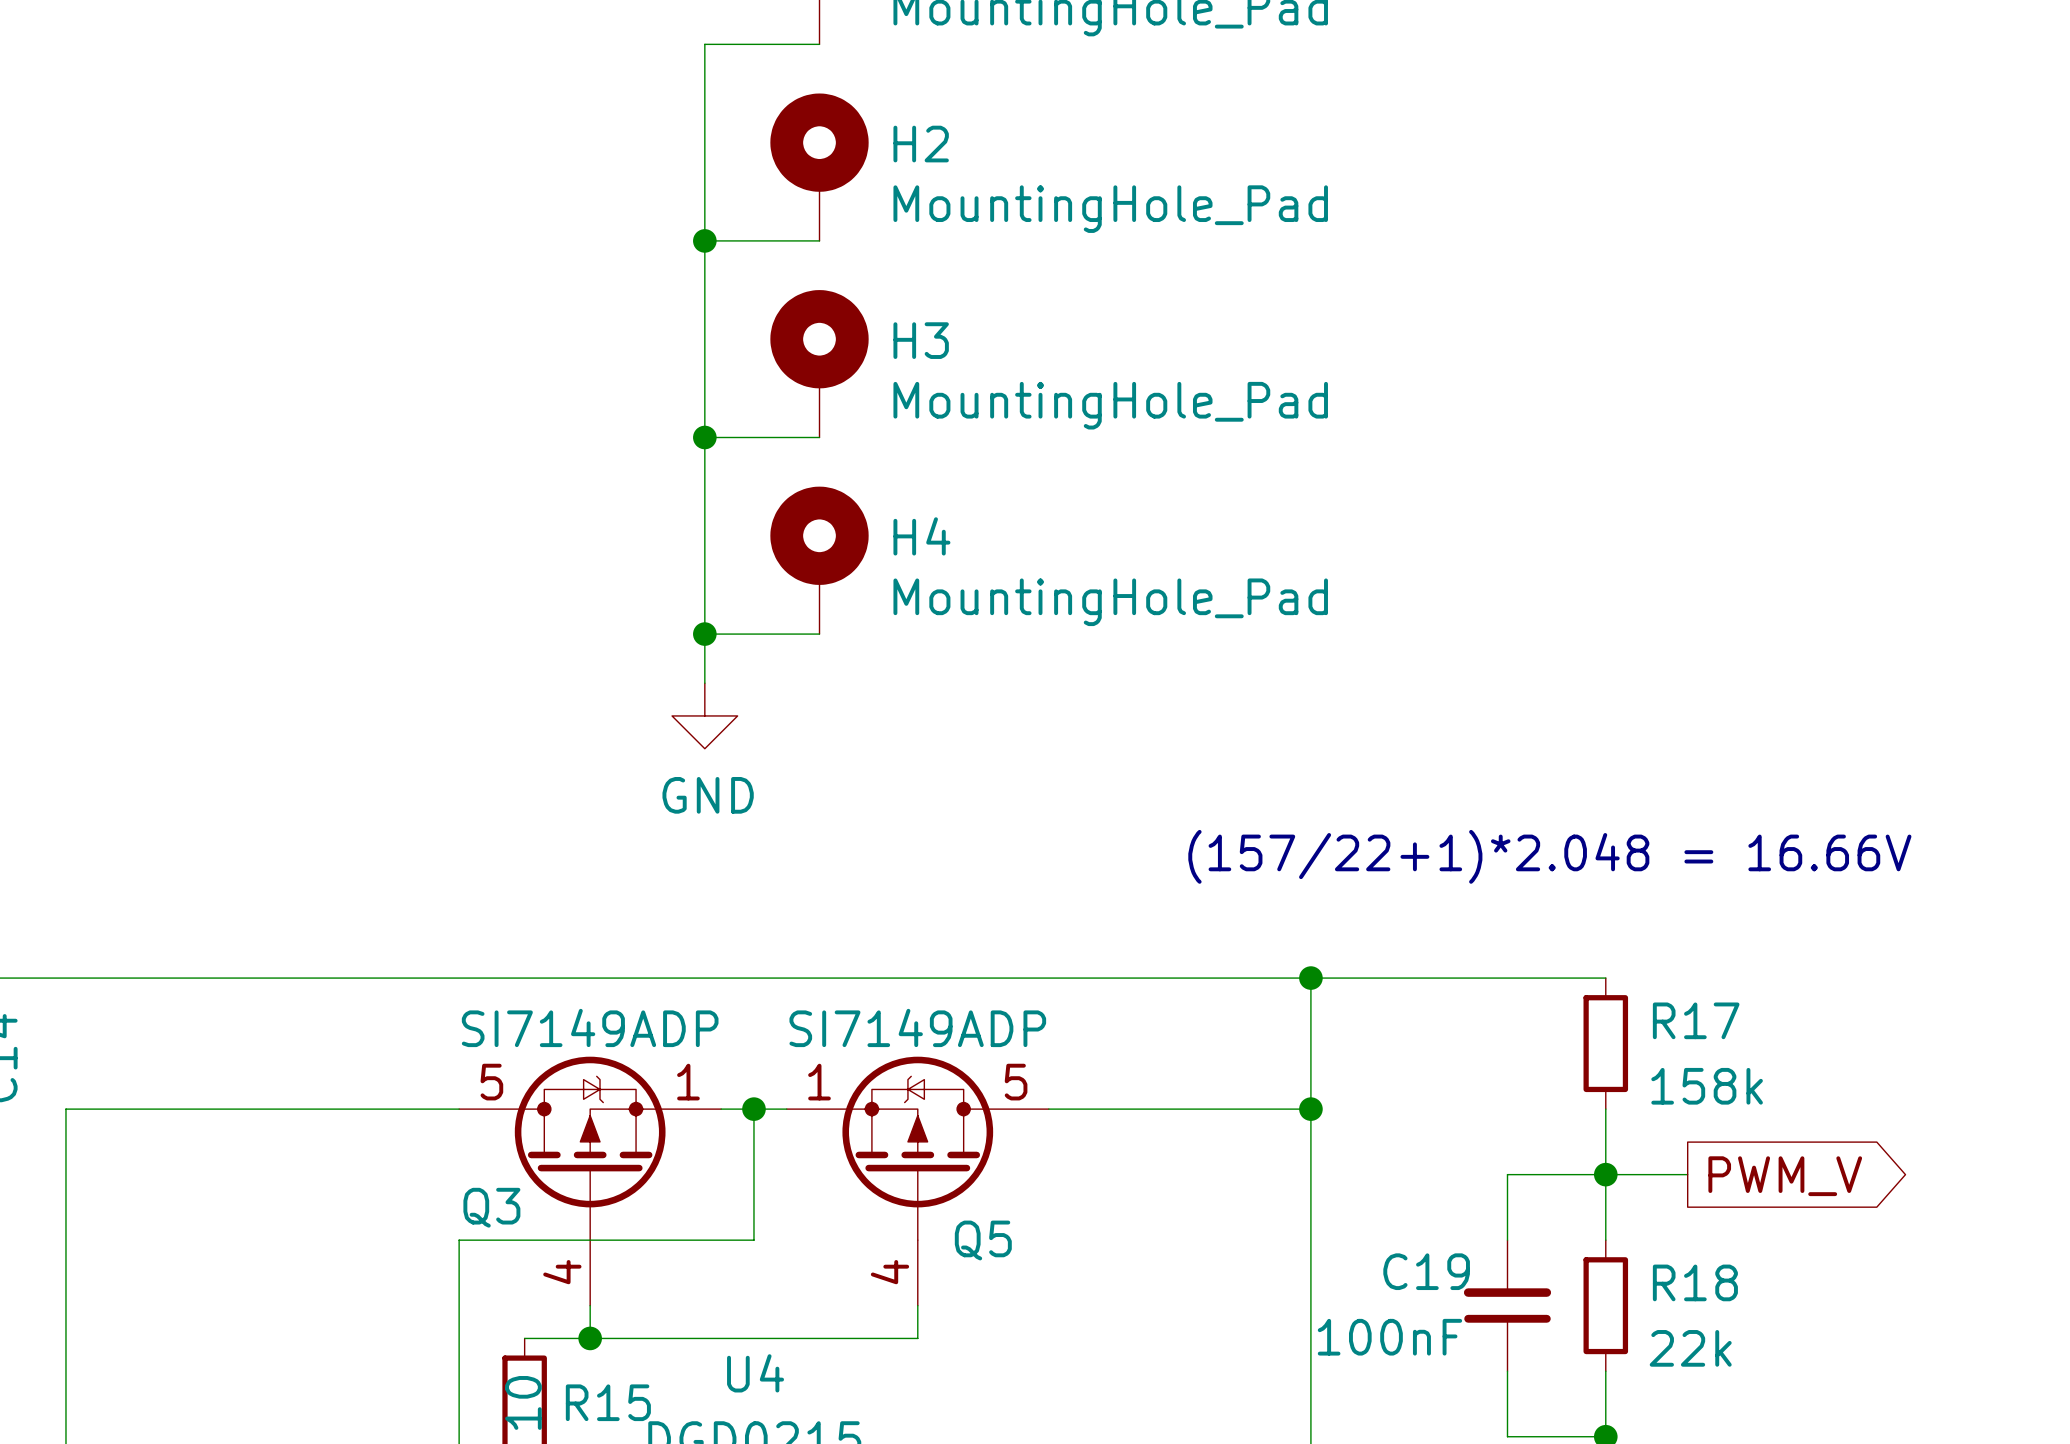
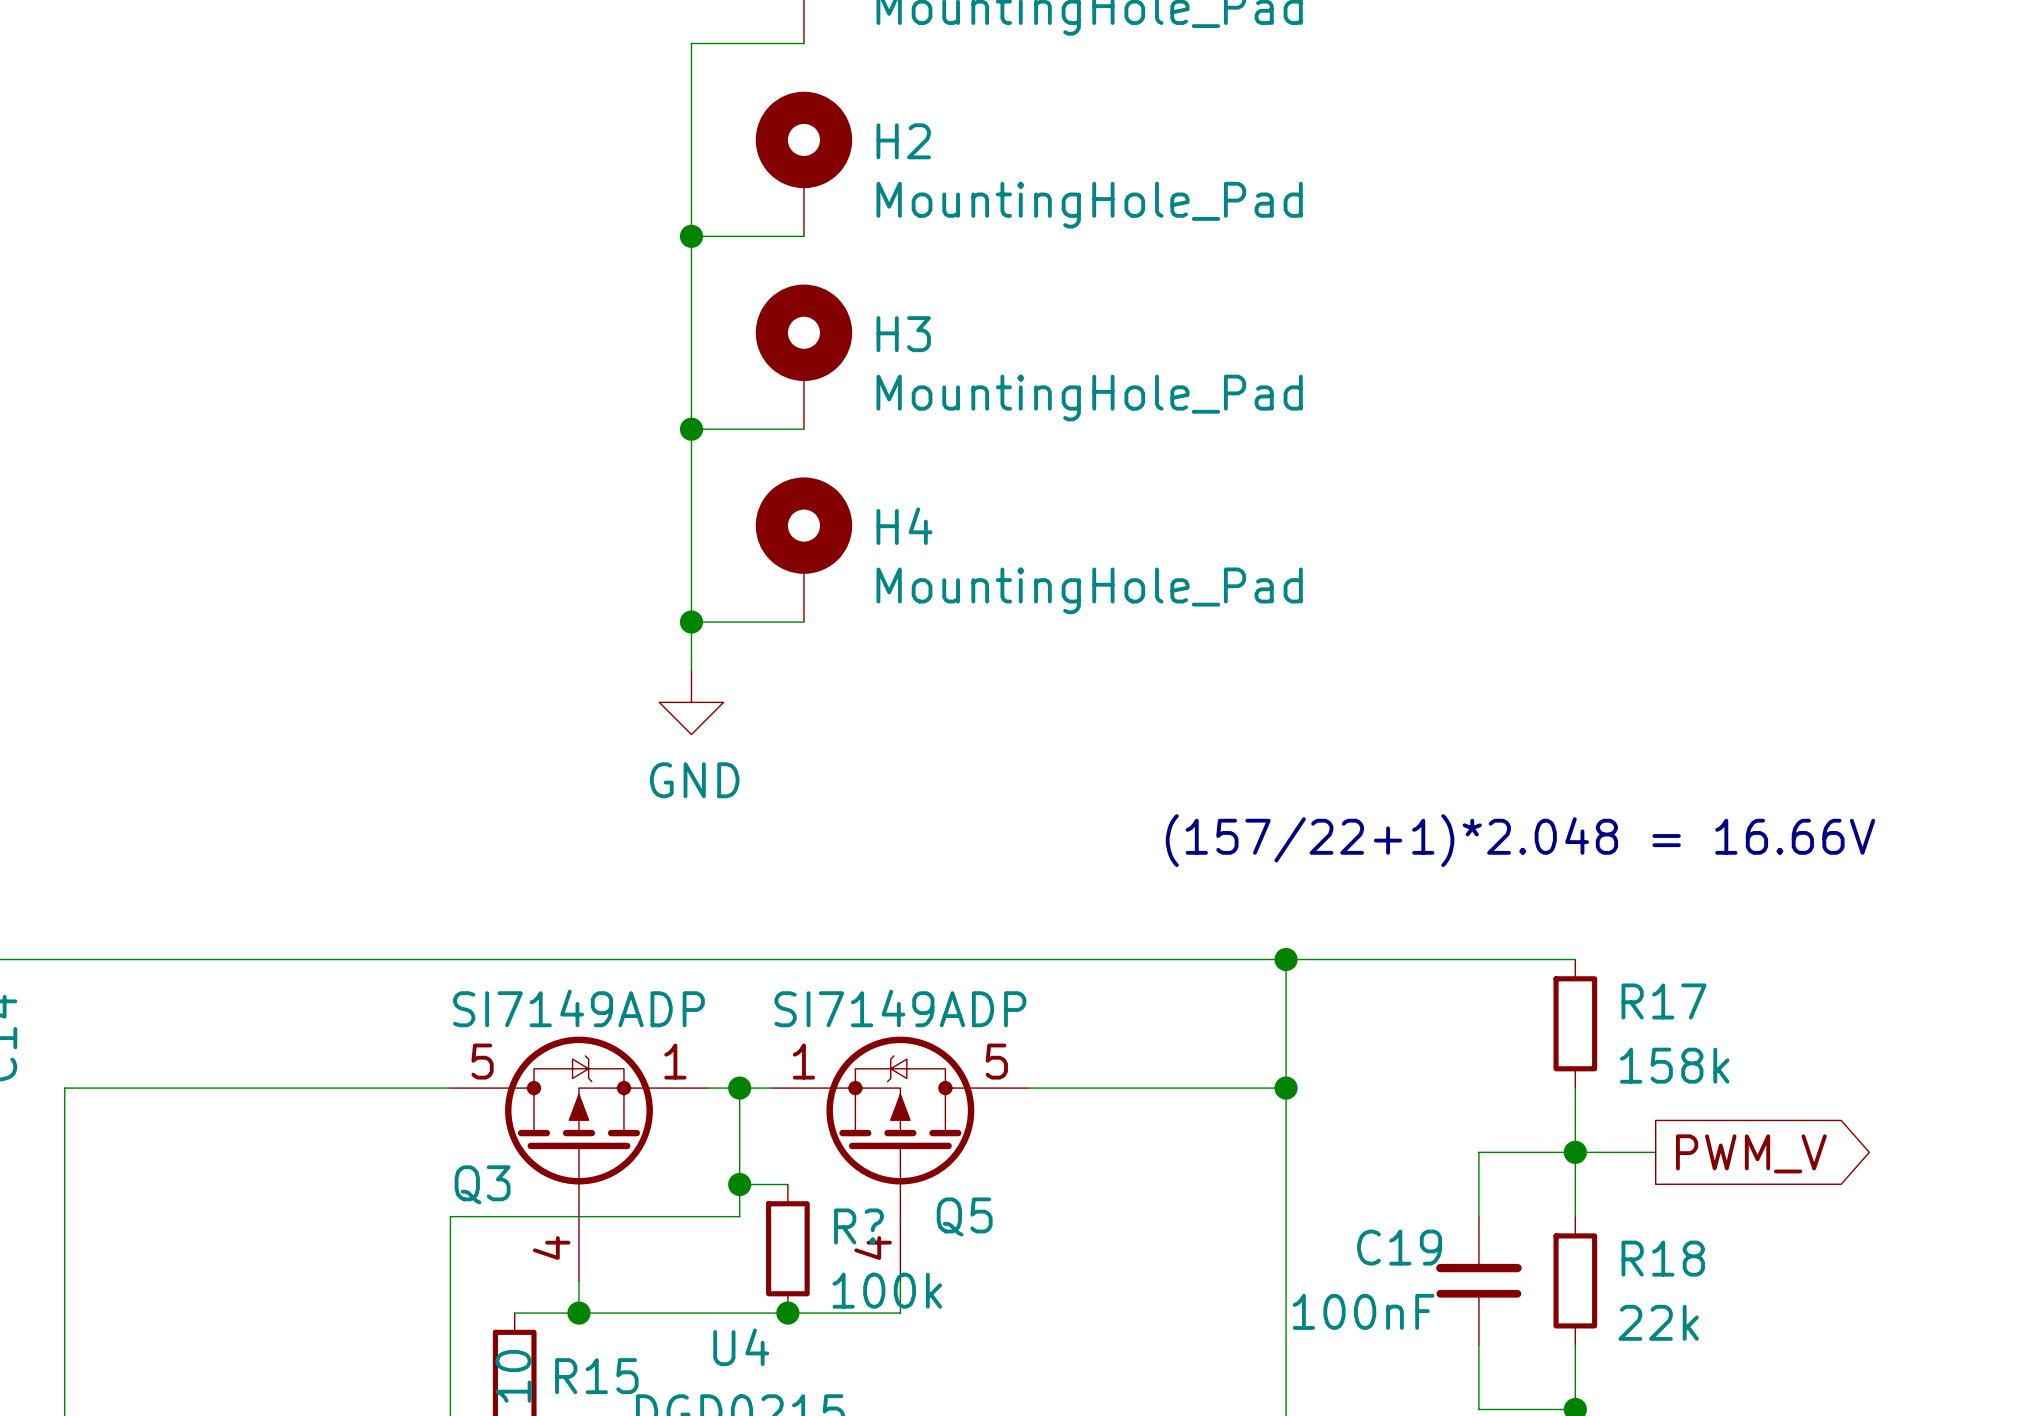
wire: none -> (739, 1184) (787, 1184)
junction: none -> (739, 1184)
R?: none -> 100k (787, 1248)
junction: none -> (787, 1313)

